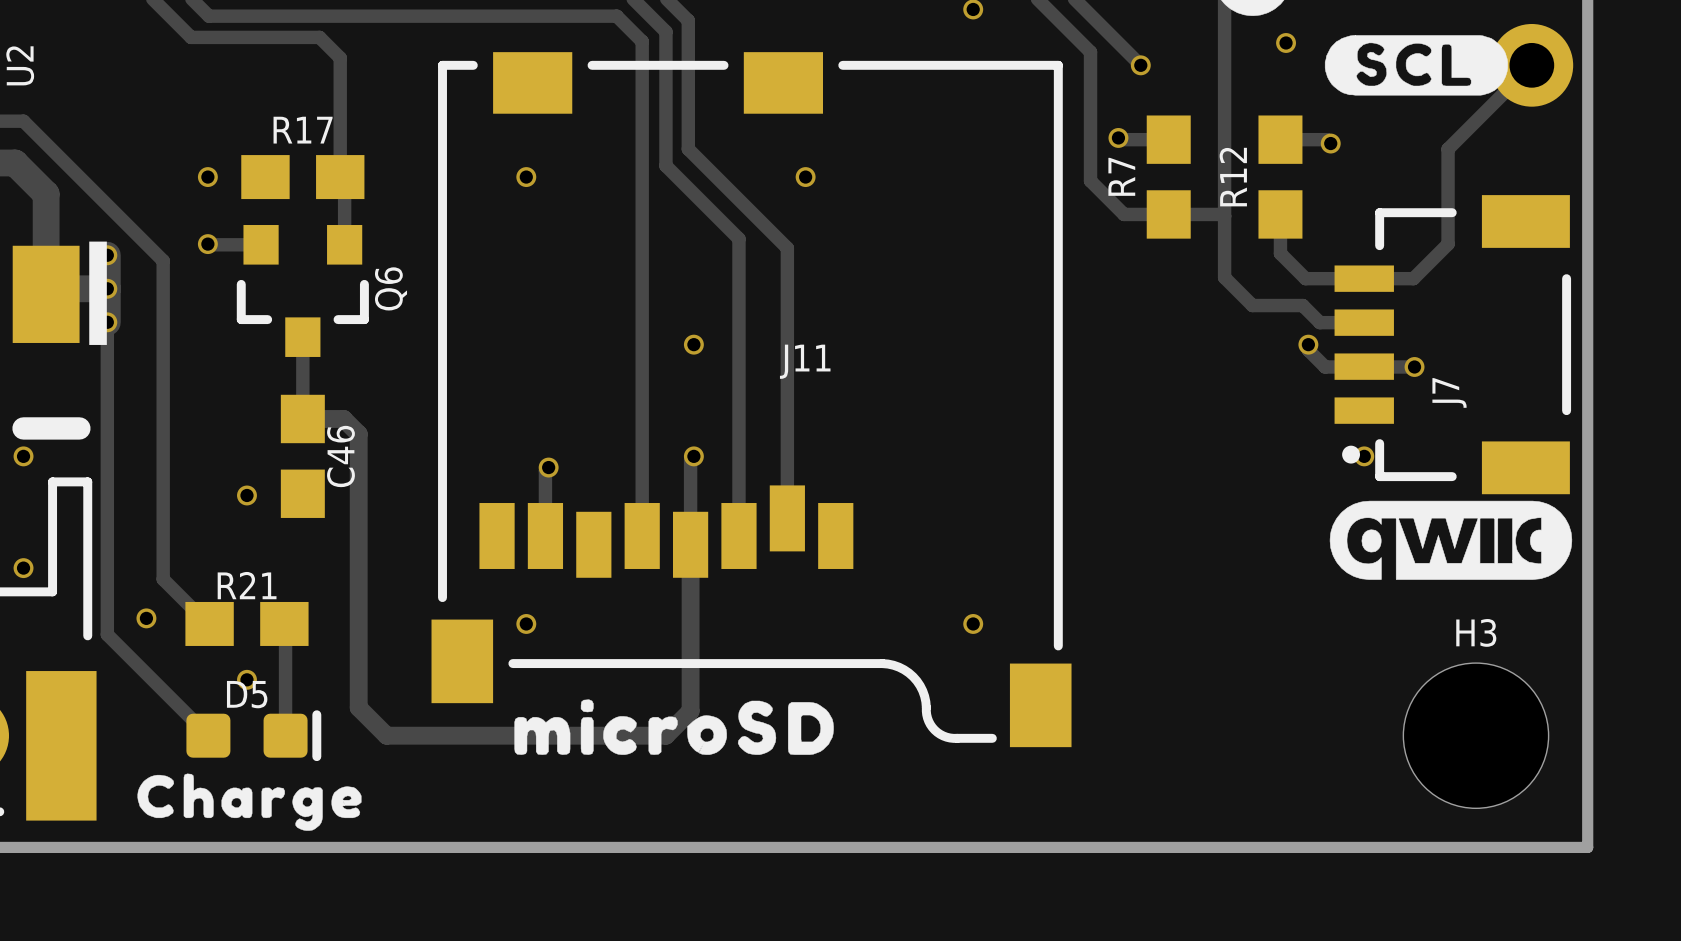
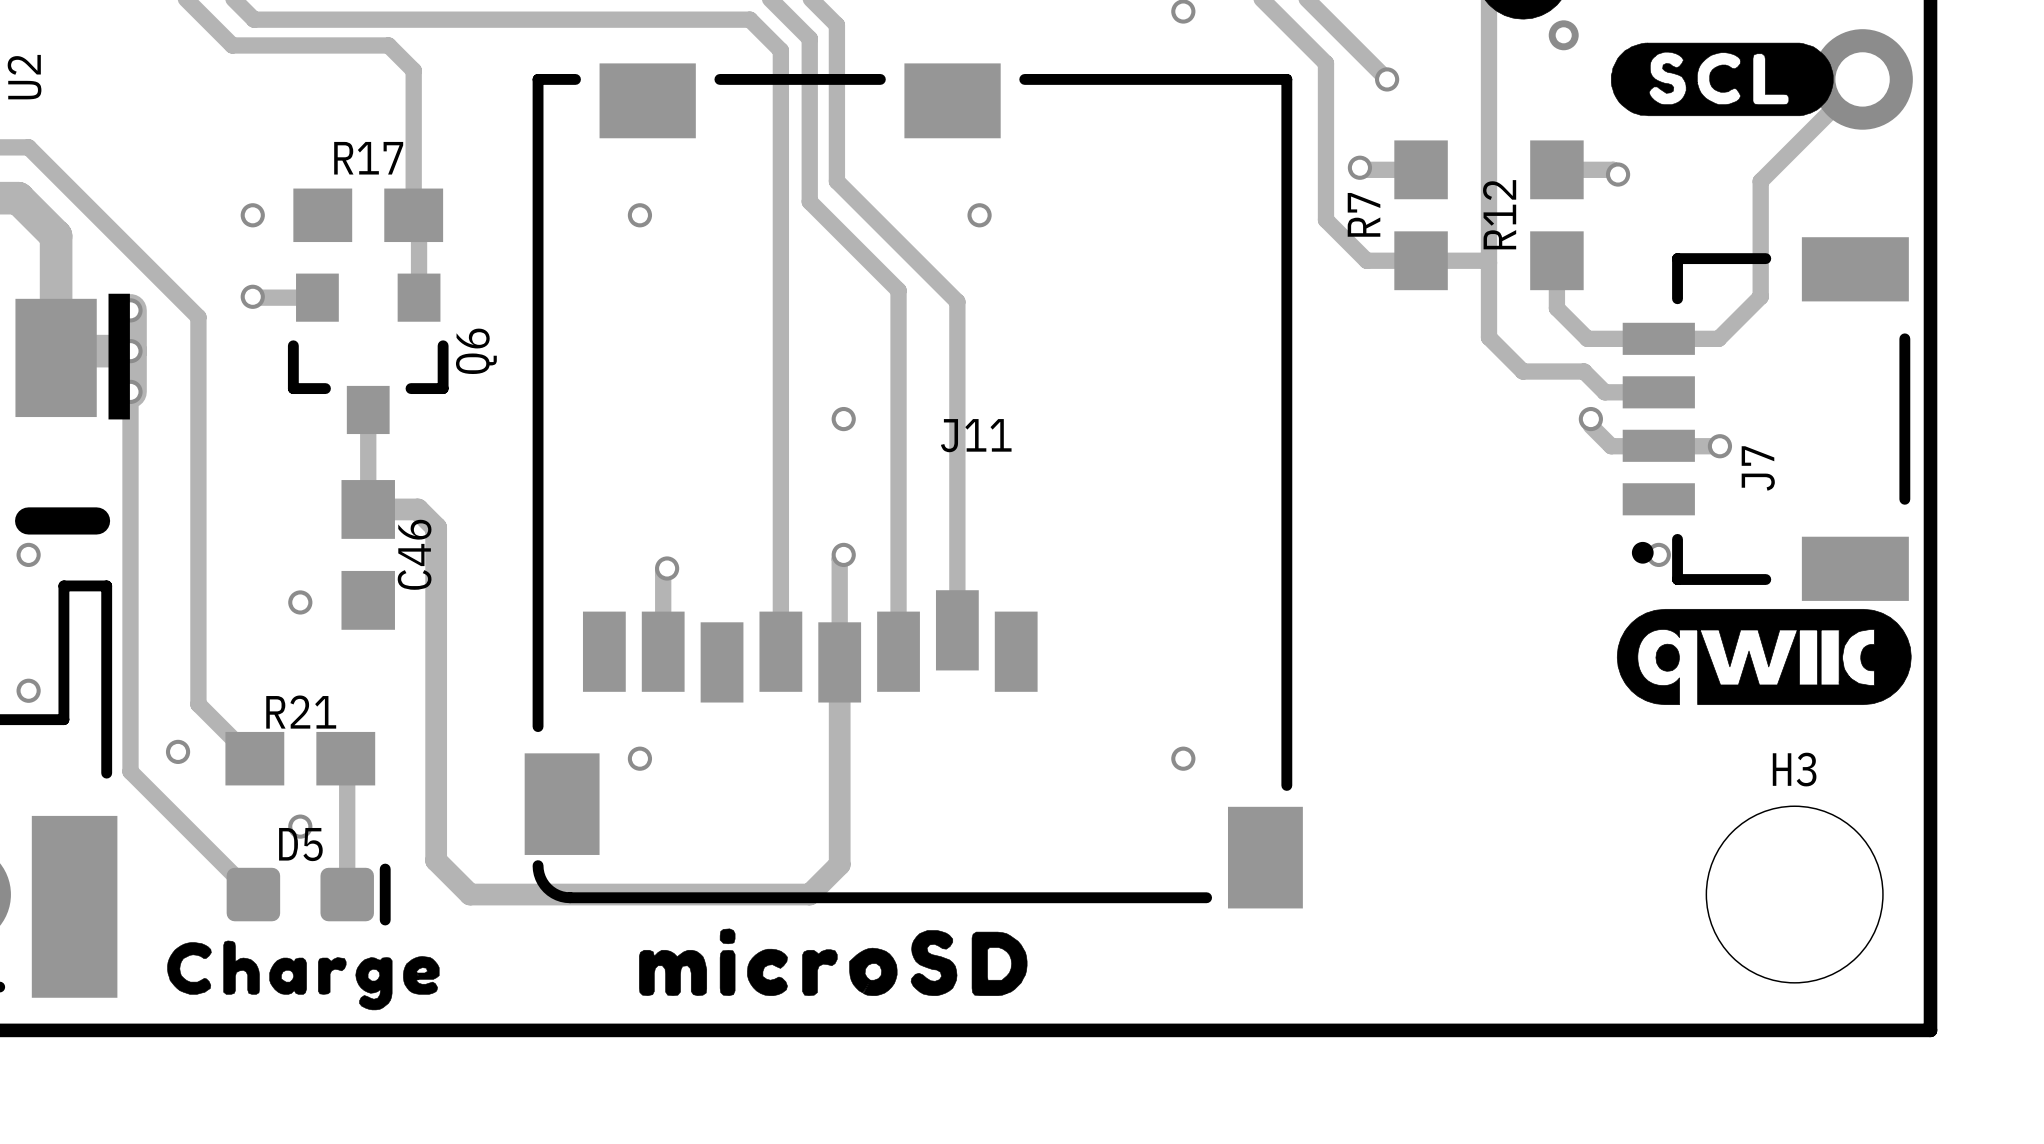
via position: (1286, 42) -> (1563, 35)
J11 footprint: [431, 52, 1072, 748] -> [524, 63, 1303, 909]
drawing position: (674, 727) -> (833, 962)

